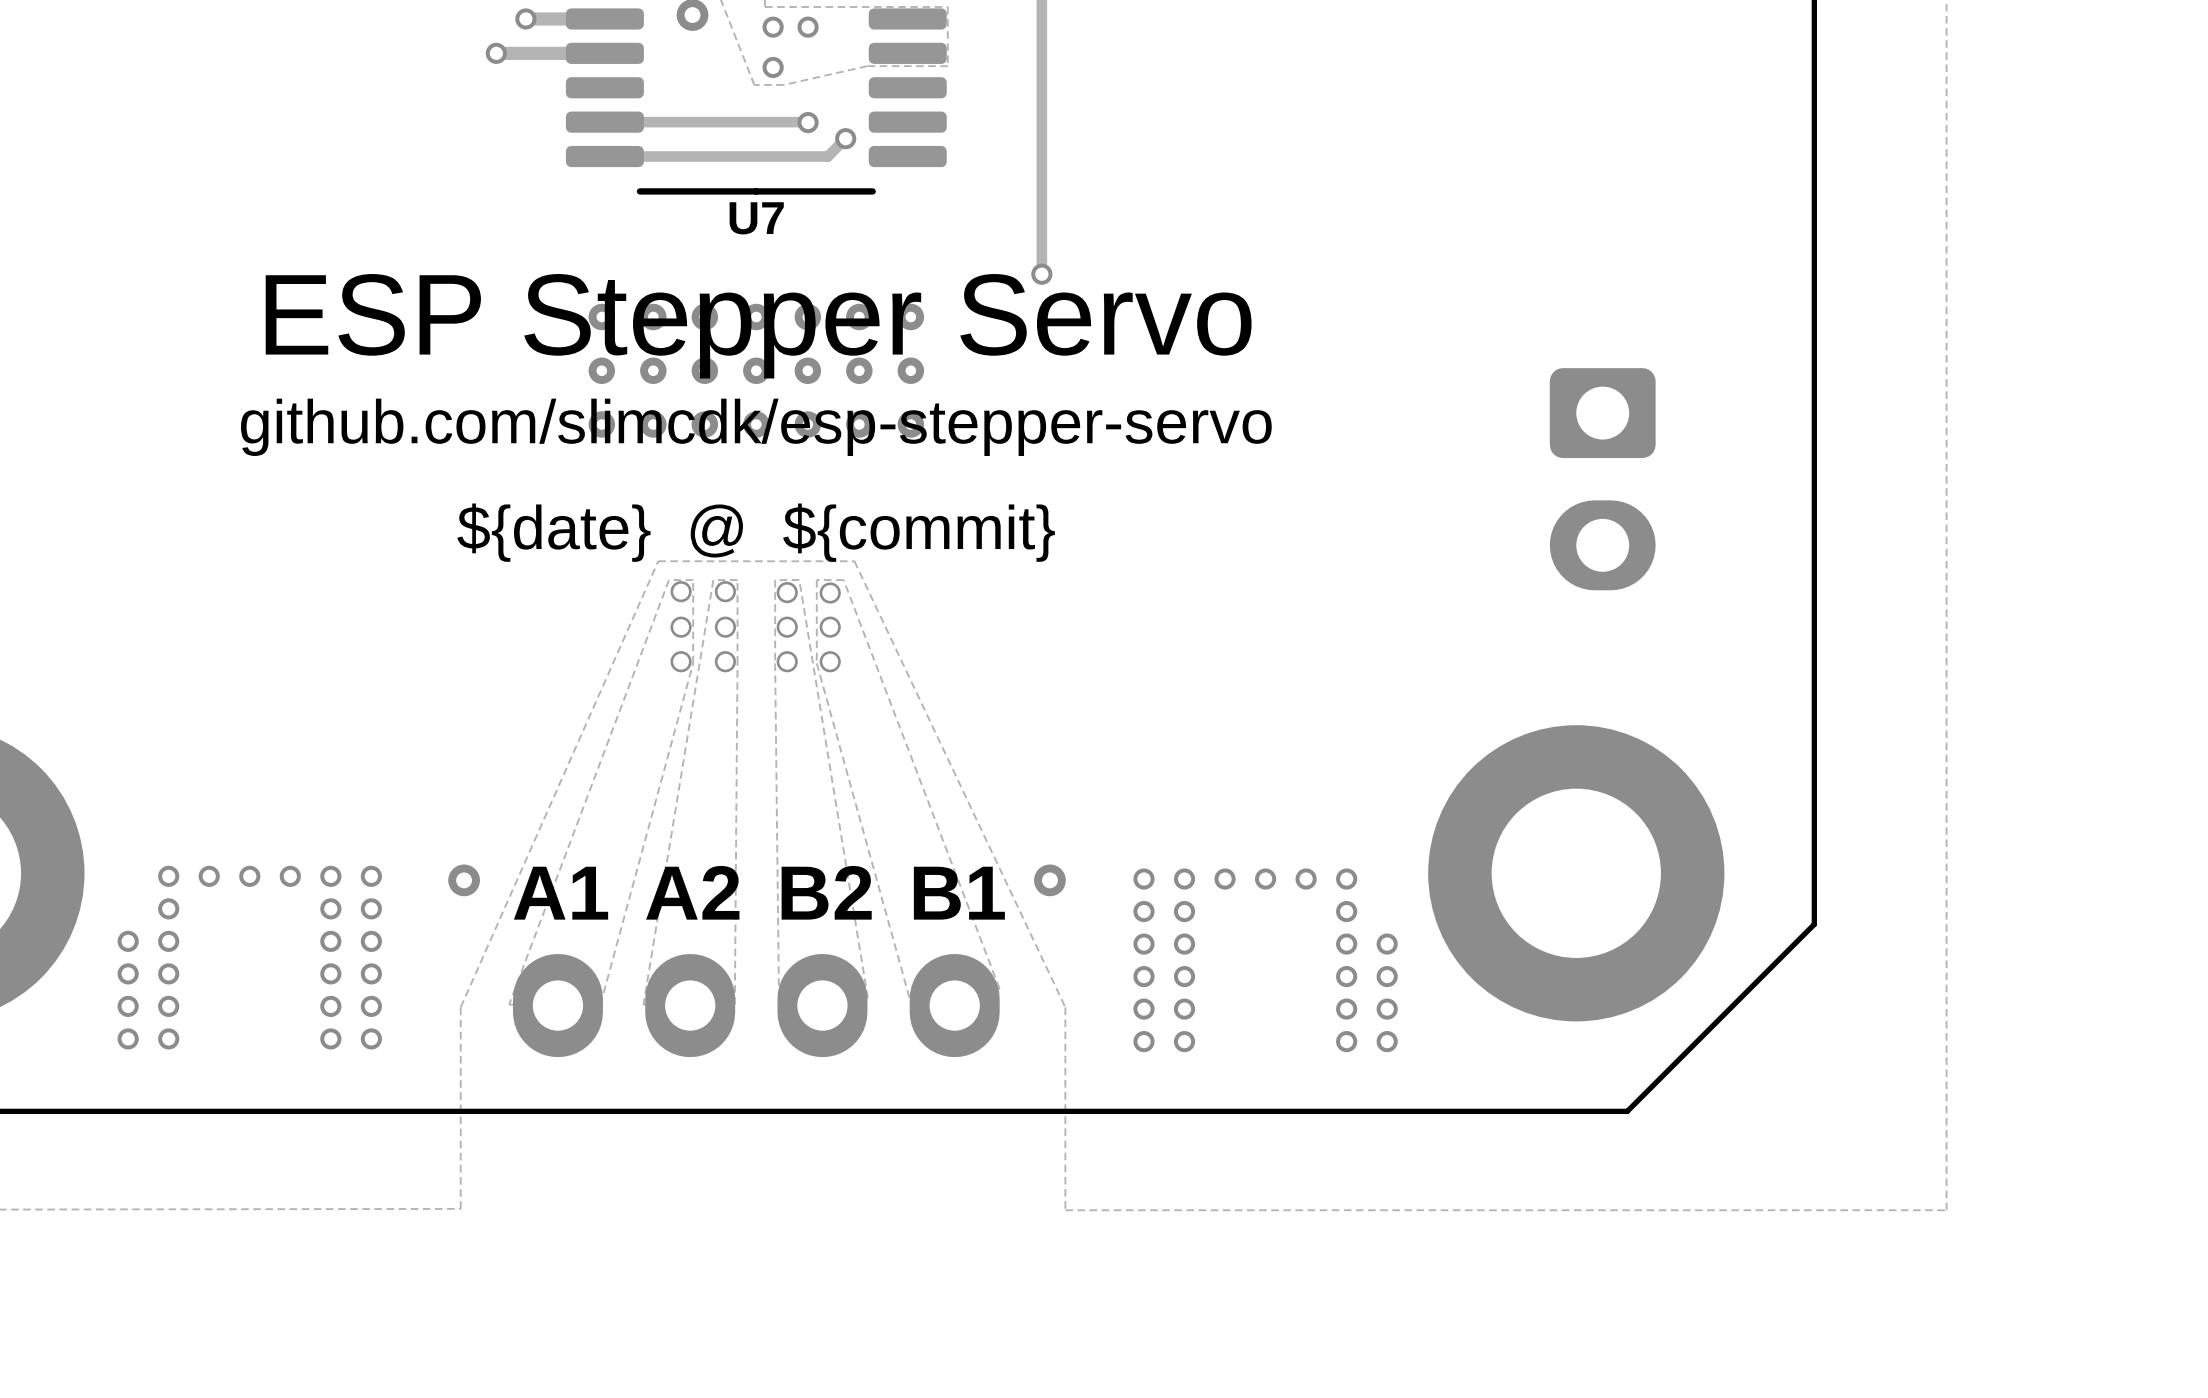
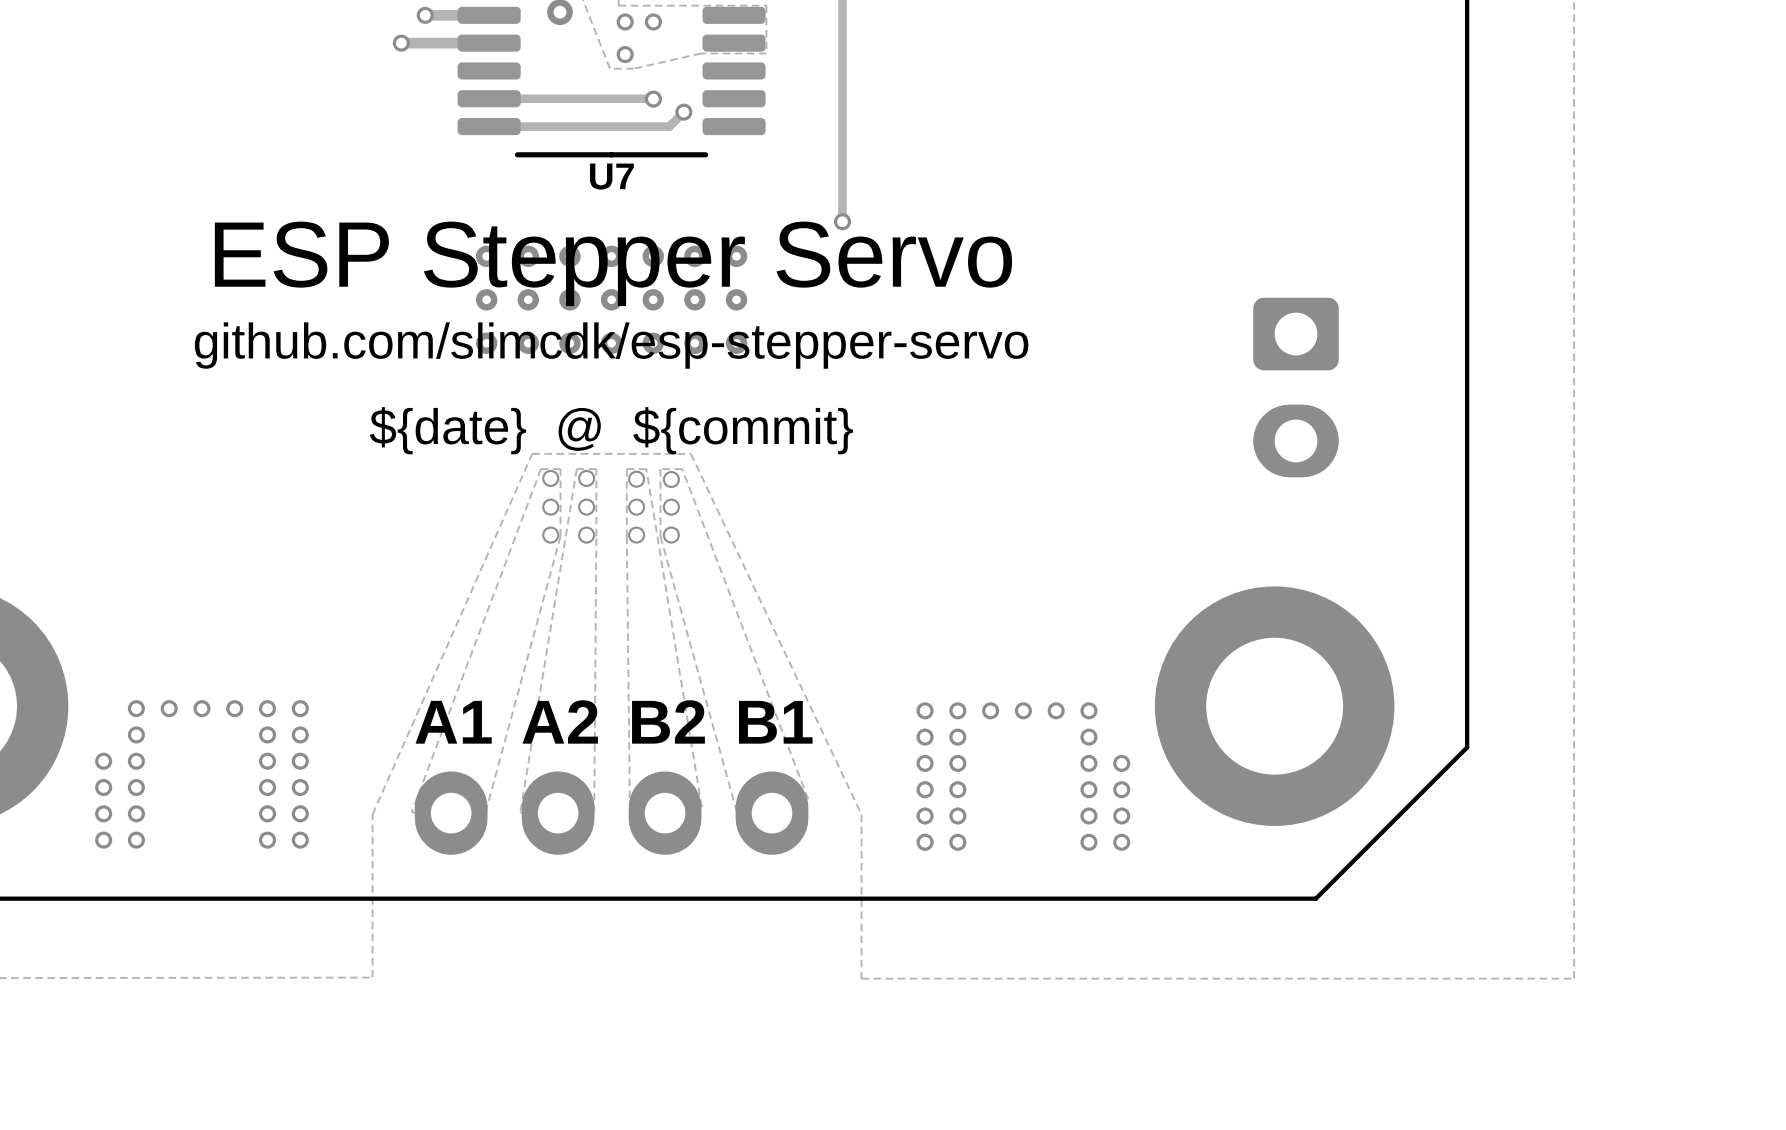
via: (464, 880) -> none
via: (1049, 880) -> none

